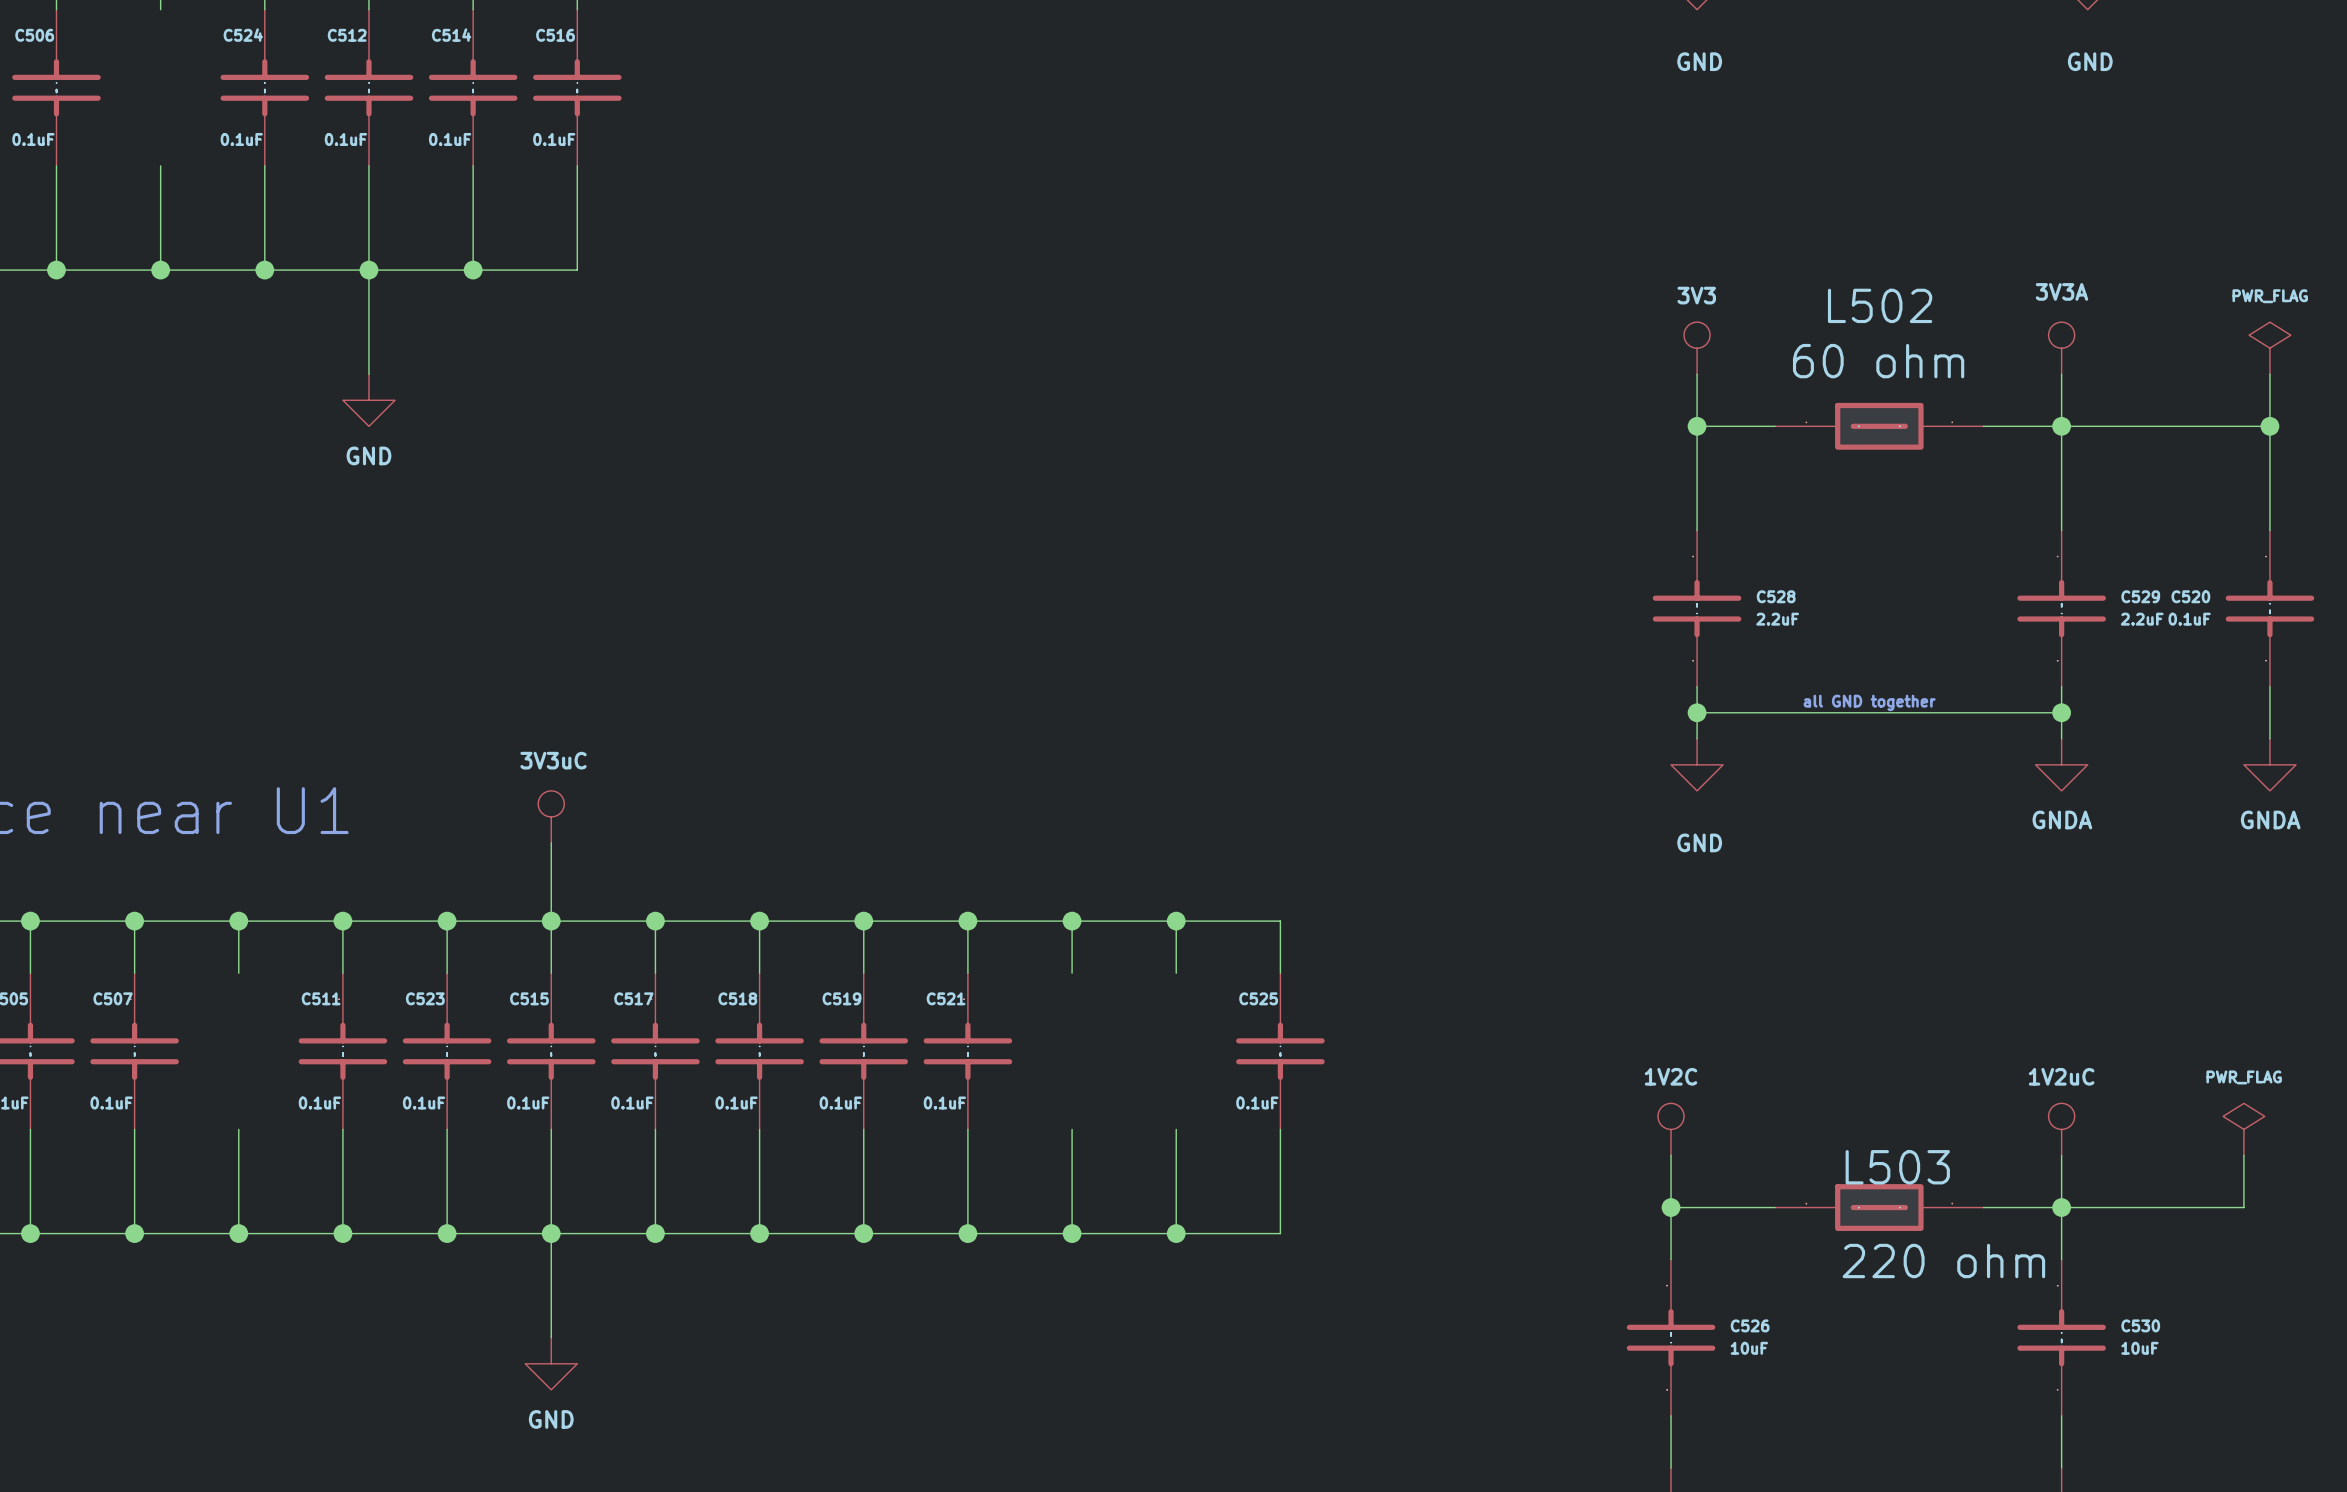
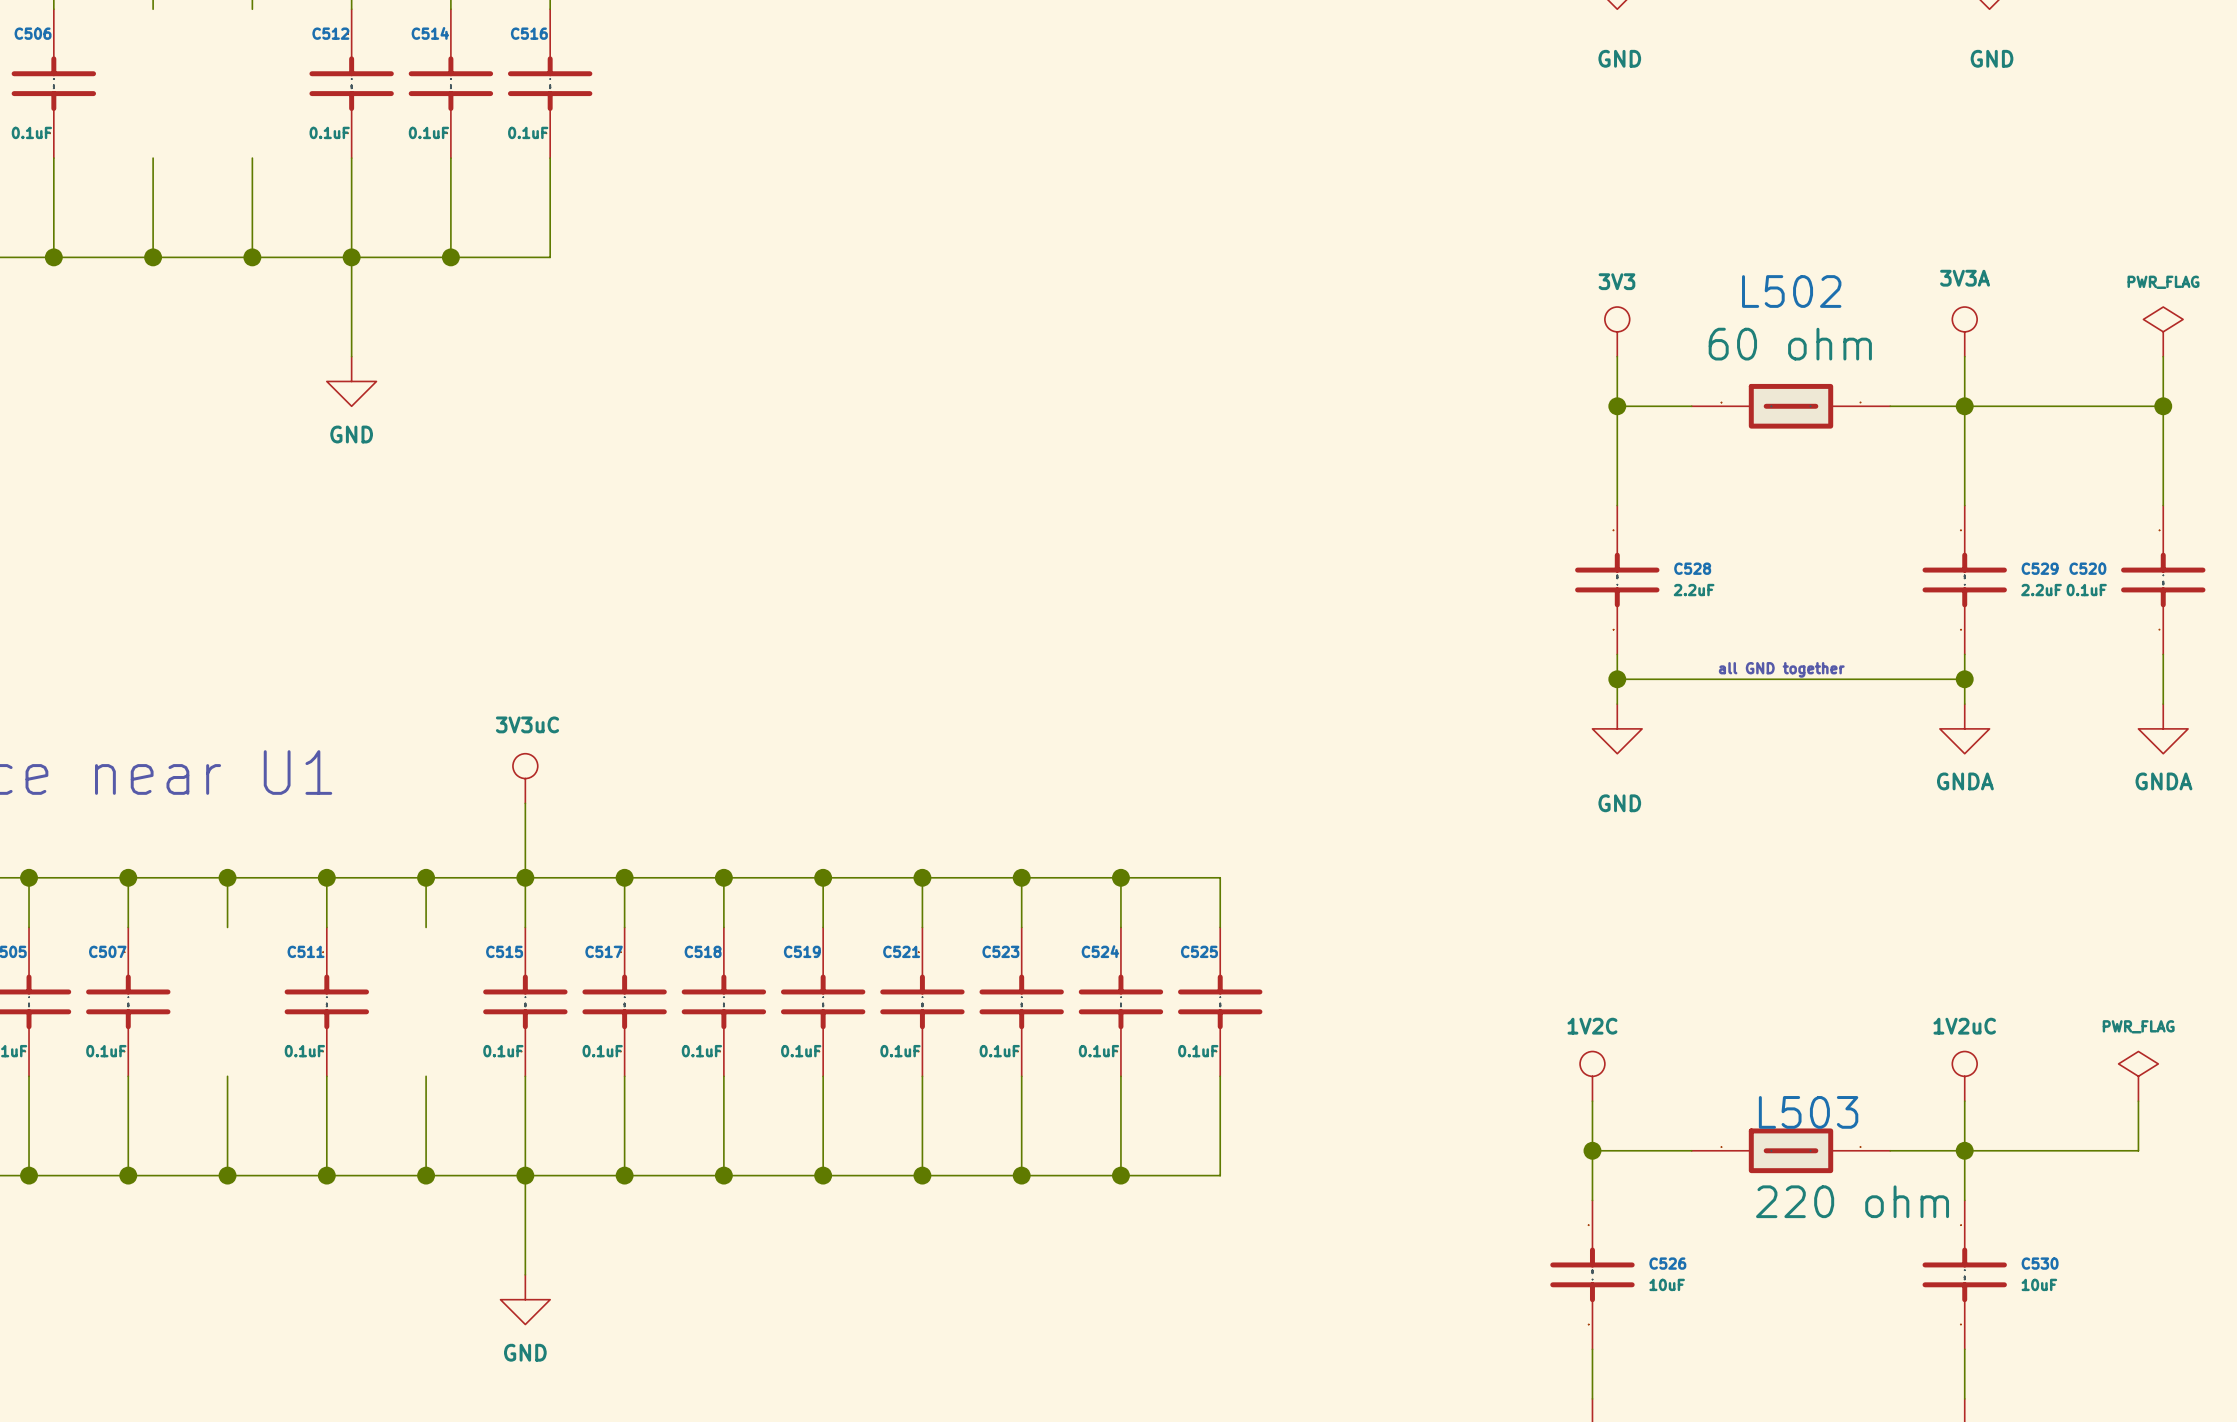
C524 position: (264, 87) -> (1120, 1001)
C523 position: (447, 1051) -> (1021, 1001)

